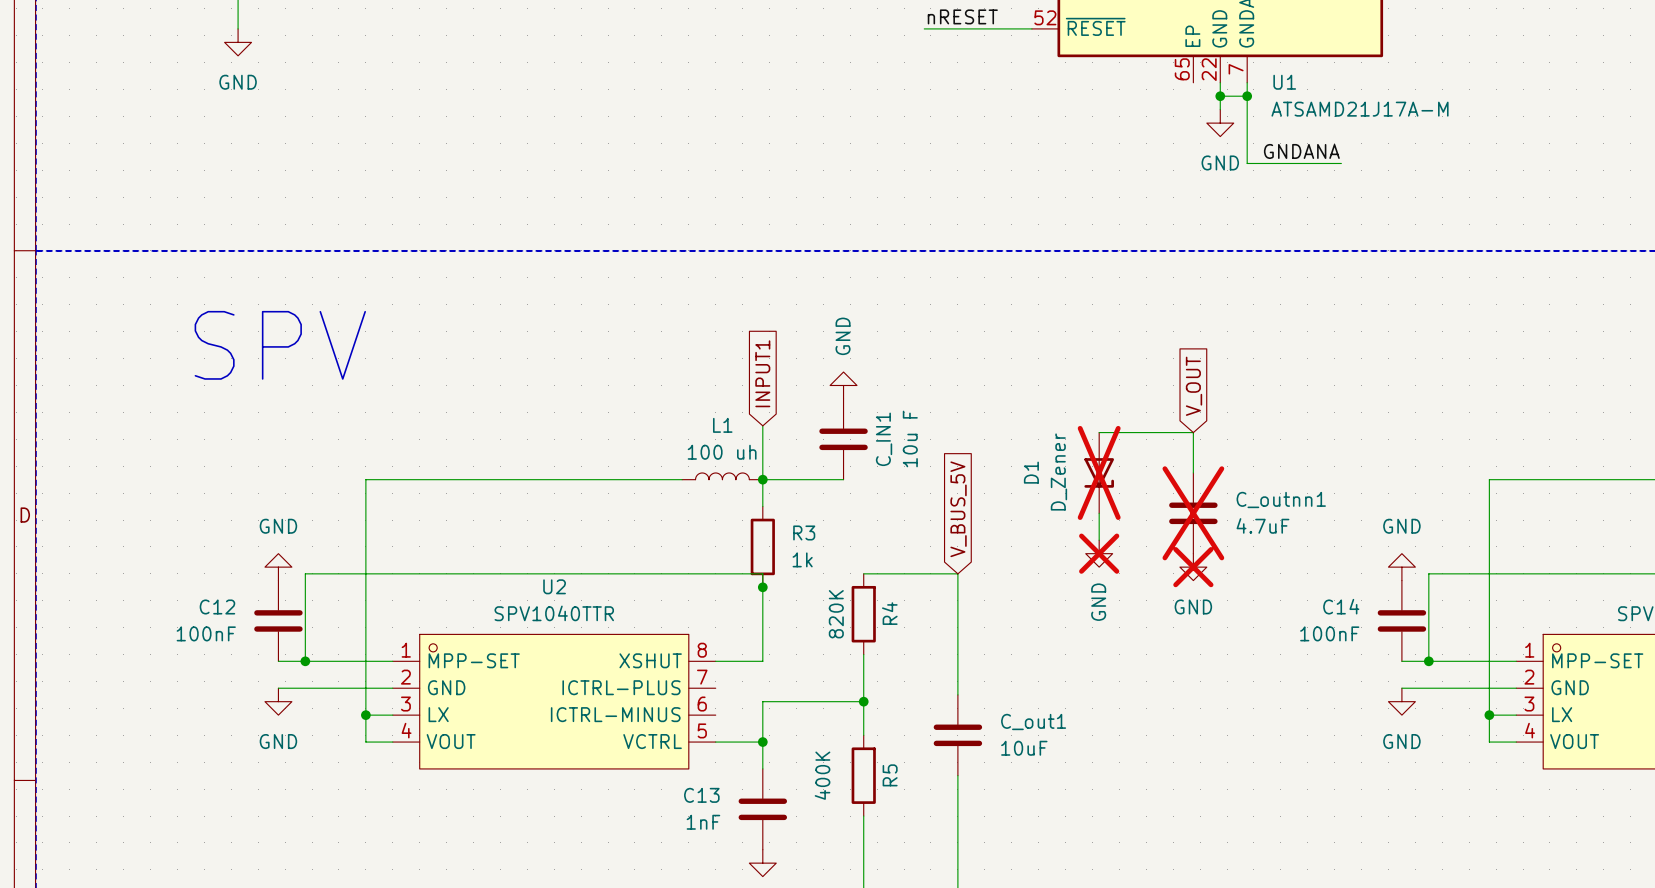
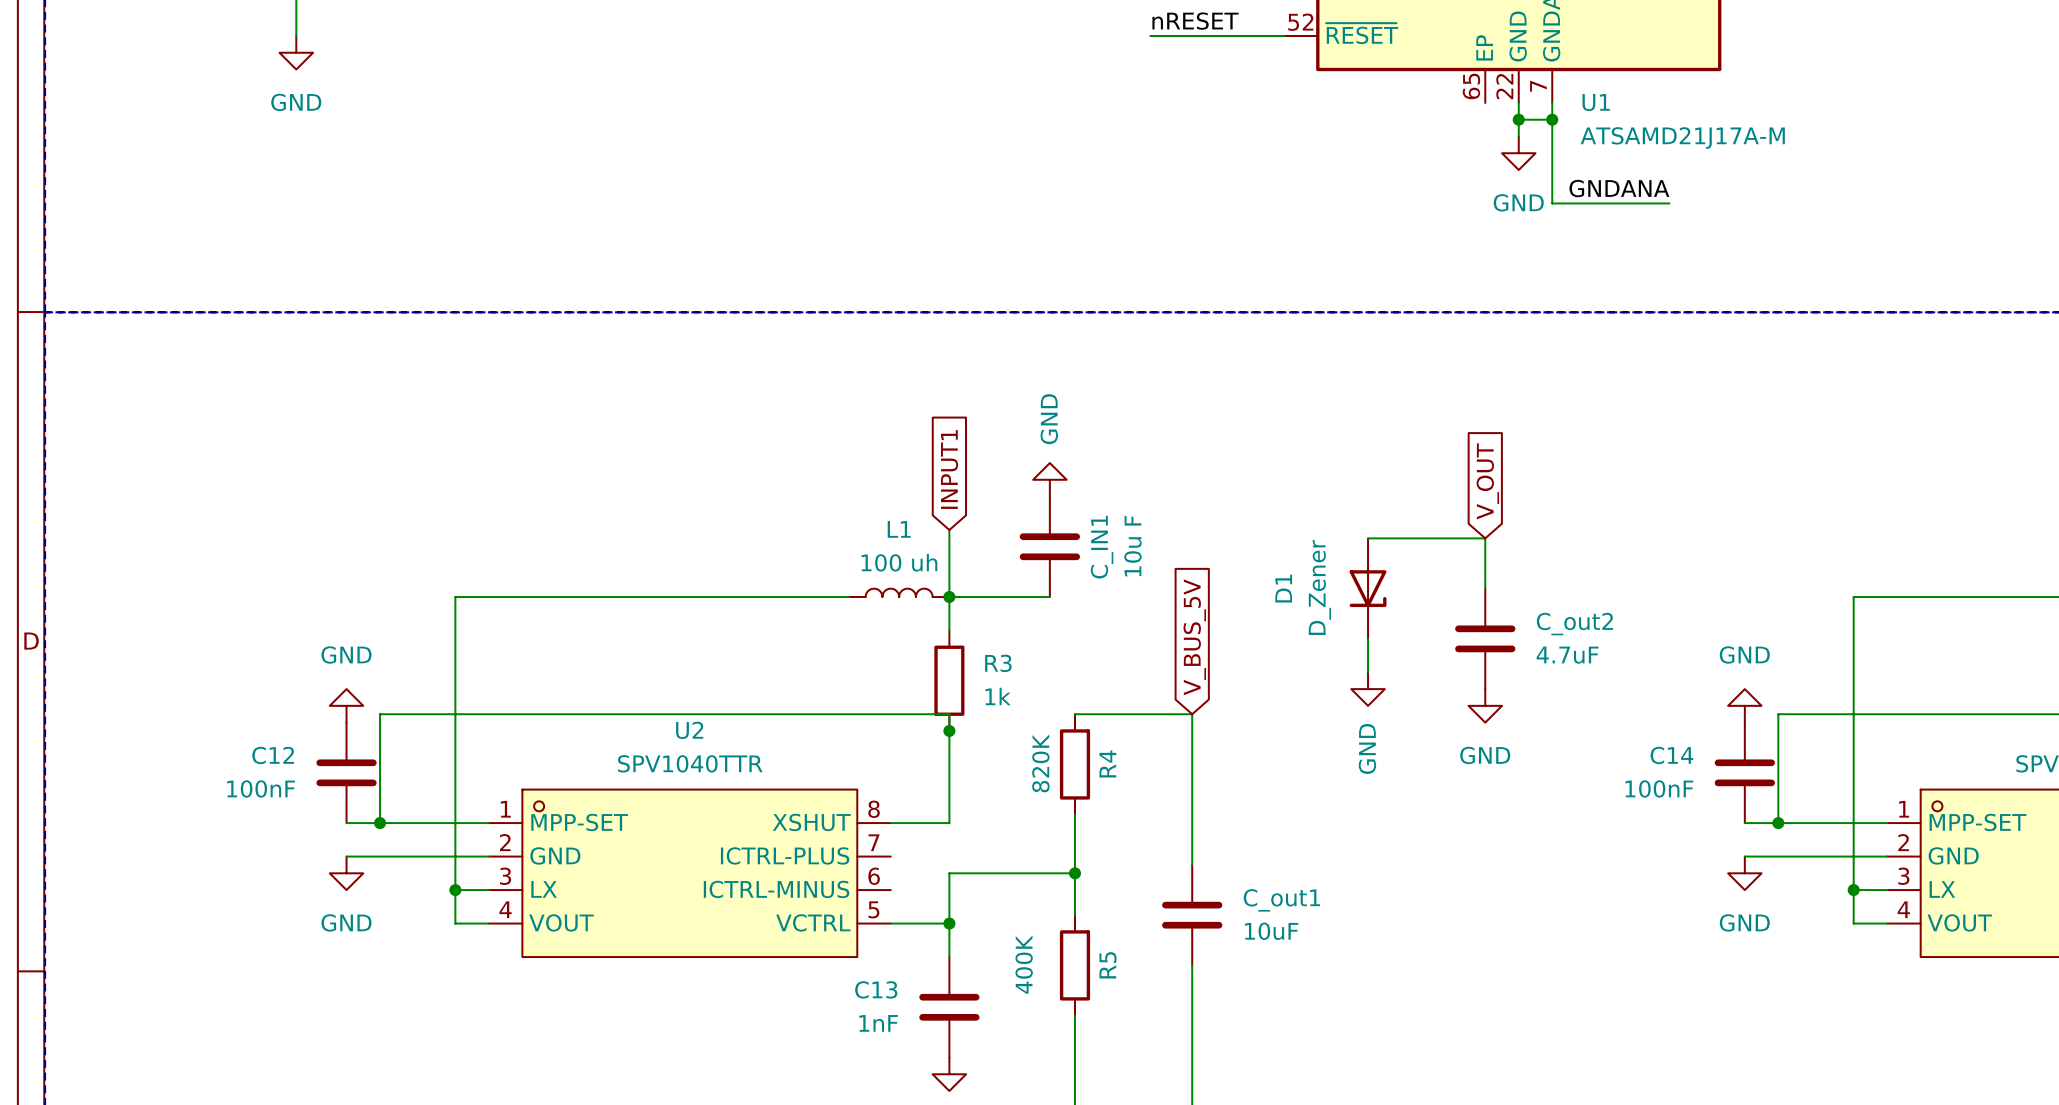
text: SPV (280, 345) -> none
D1 do-not-place cross: (1099, 472) -> none
C_outnn1 name: C_outnn1 (1281, 499) -> C_out2 (1574, 624)
C_outnn1 do-not-place cross: (1193, 513) -> none
power symbol do-not-place cross: (1099, 553) -> none
power symbol do-not-place cross: (1193, 567) -> none

